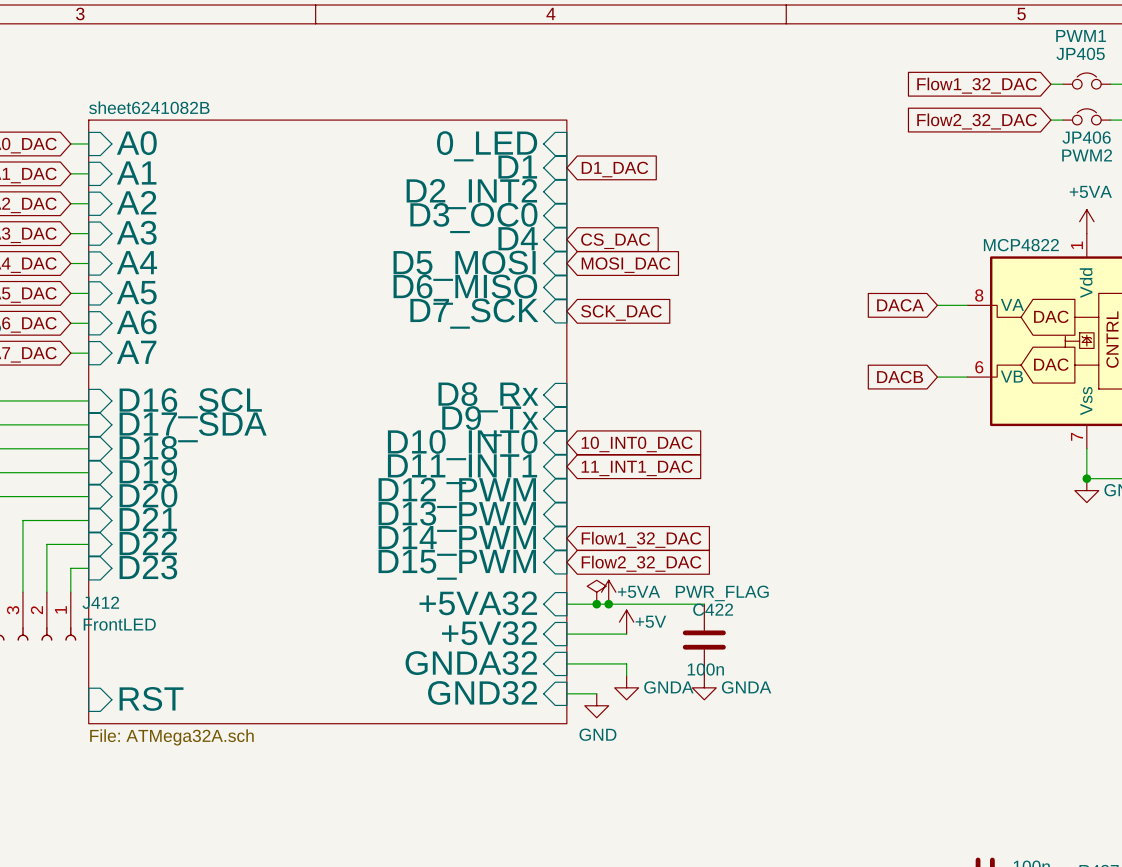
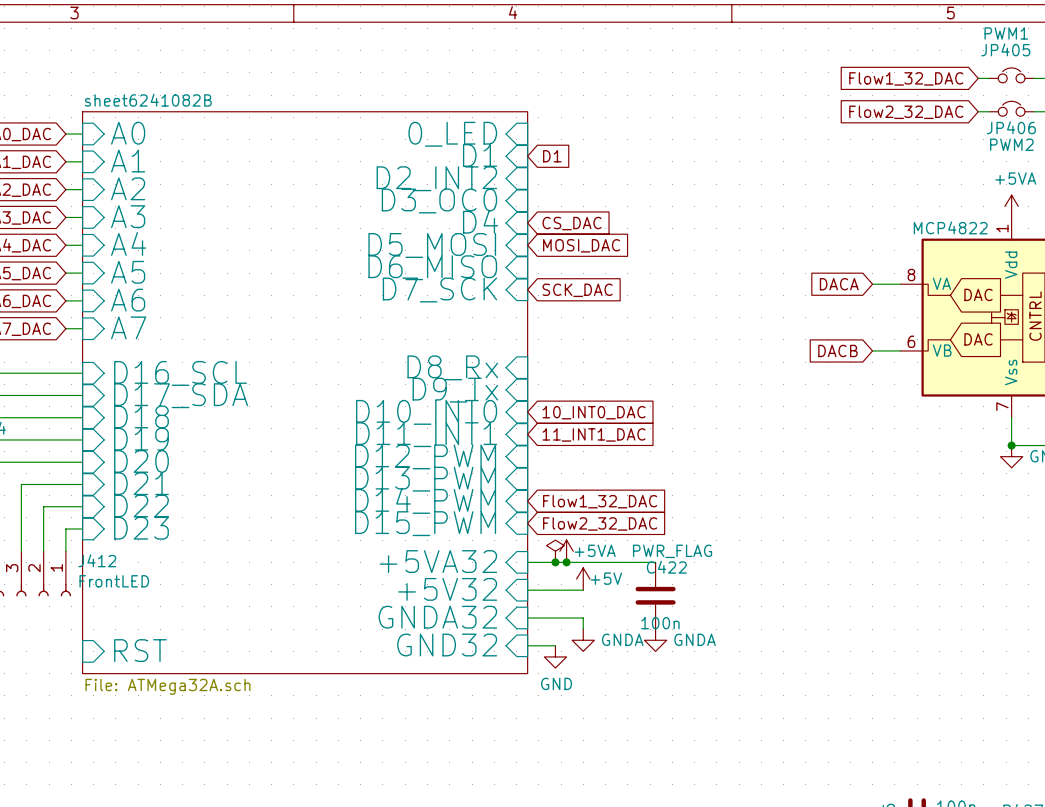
global label: D1_DAC (614, 169) -> D1 (552, 156)

